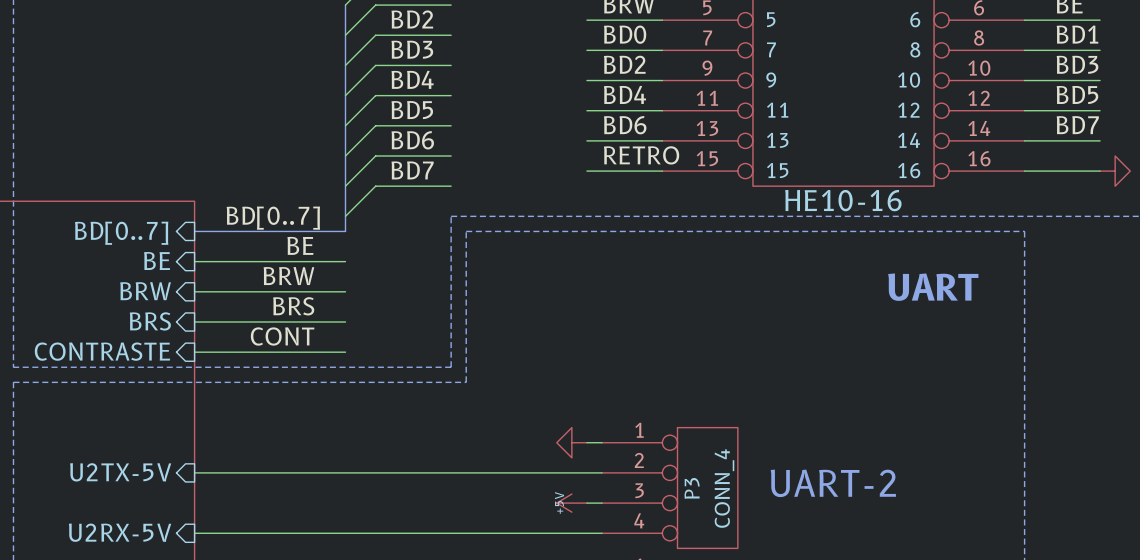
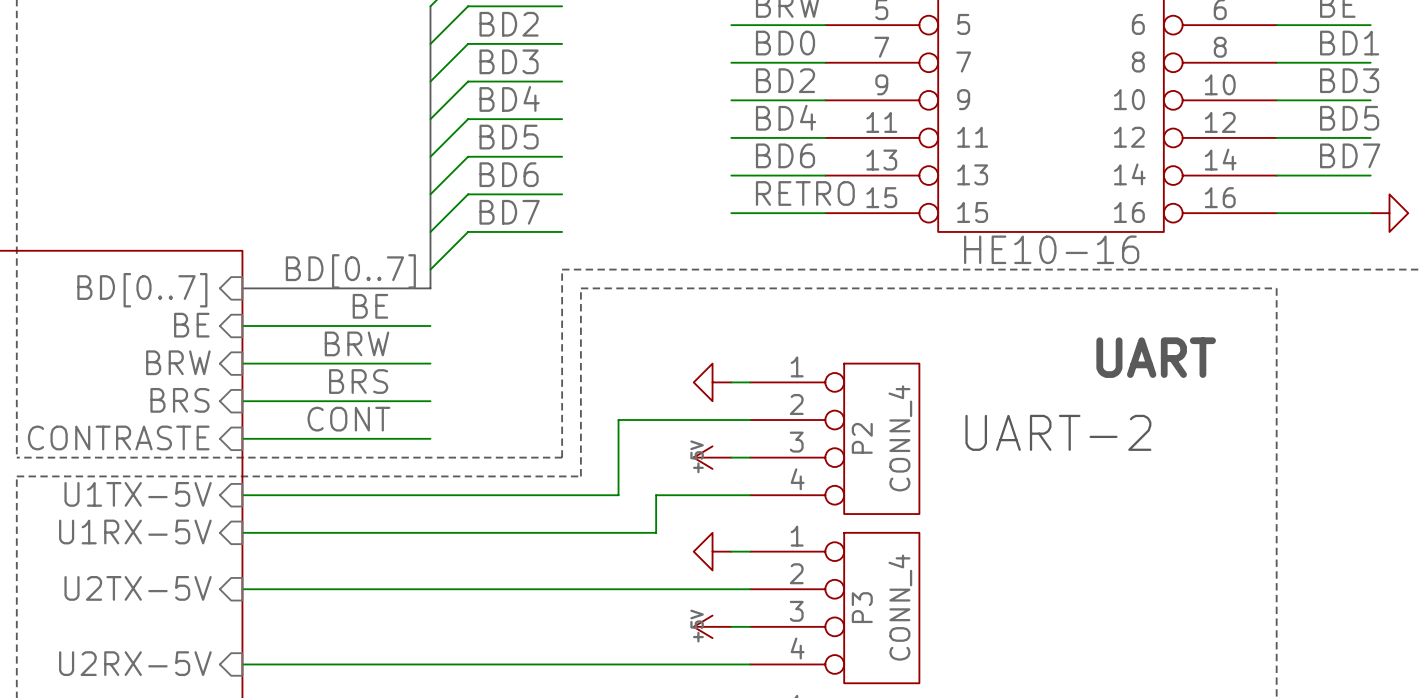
power symbol: none -> (712, 382)
wire: none -> (731, 382) (750, 382)
wire: none -> (750, 420) (618, 420) (618, 495) (242, 495)
P2: none -> CONN_4 (834, 438)
power symbol: none -> +5V (712, 457)
wire: none -> (731, 457) (750, 457)
sheet pin: none -> U1TX-5V (138, 494)
wire: none -> (750, 495) (656, 495) (656, 532) (242, 532)
sheet pin: none -> U1RX-5V (135, 531)
text position: UART-2 (833, 483) -> UART-2 (1058, 432)

